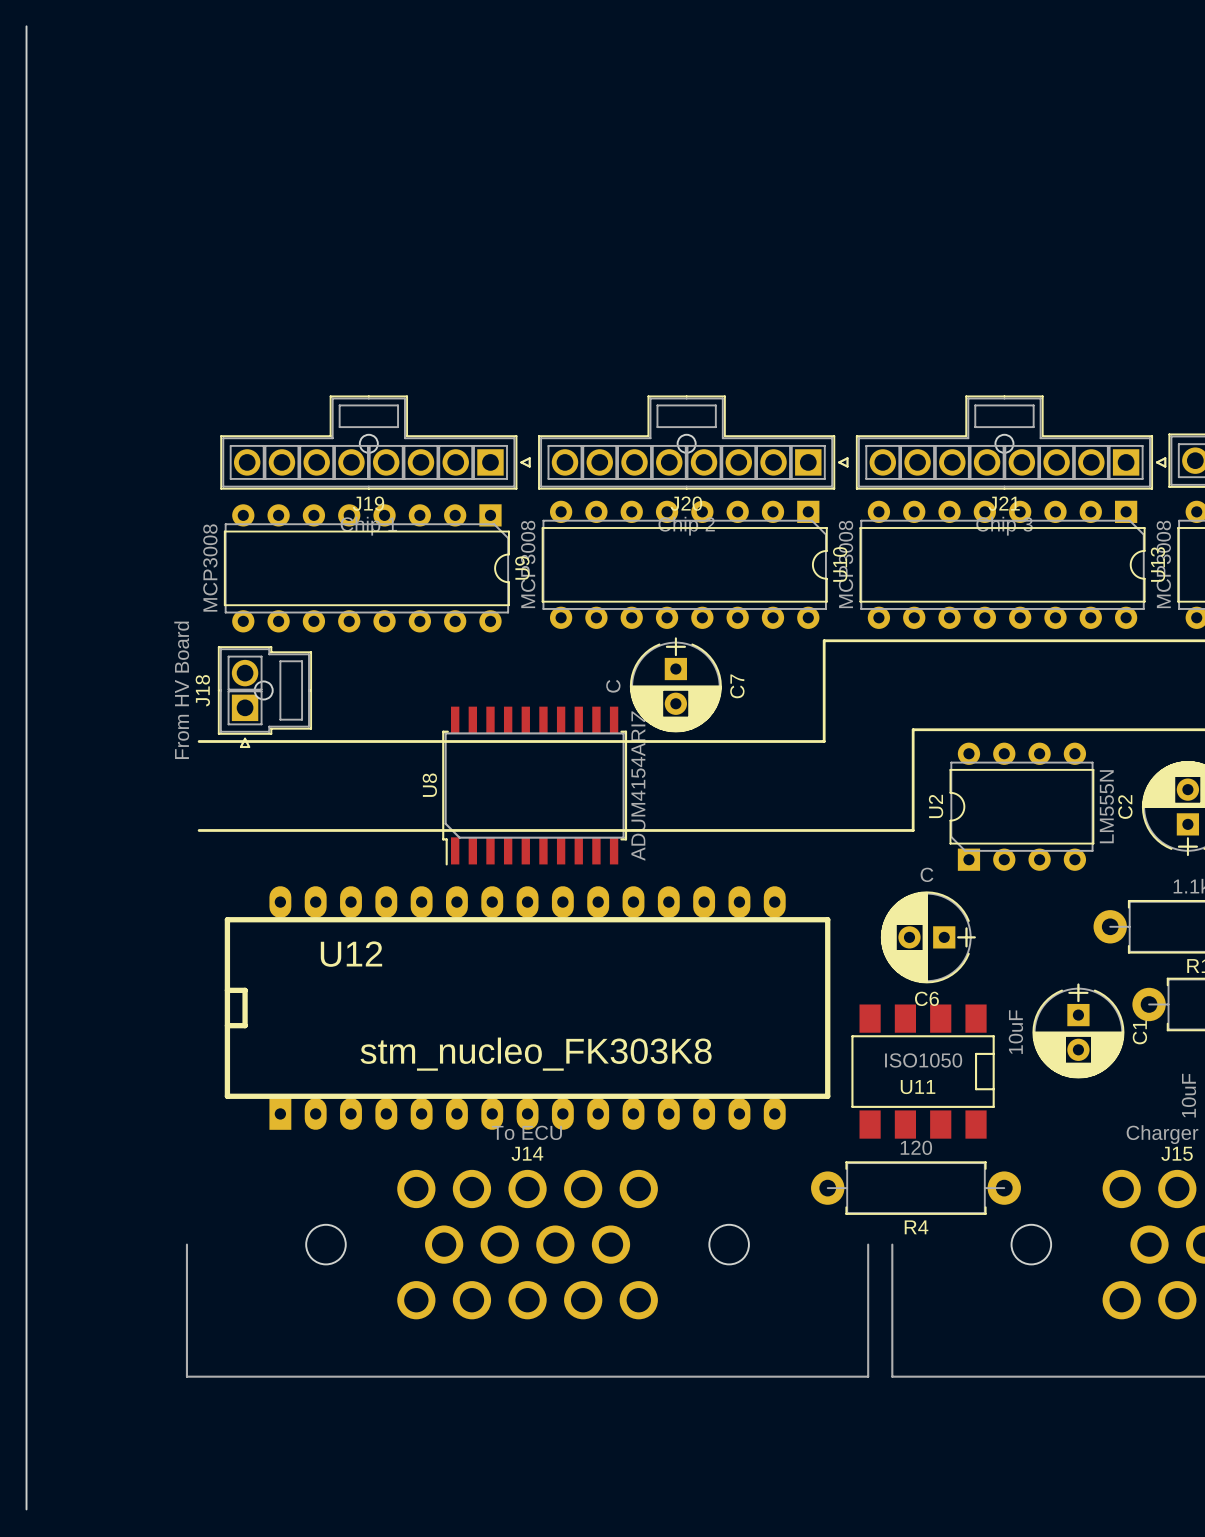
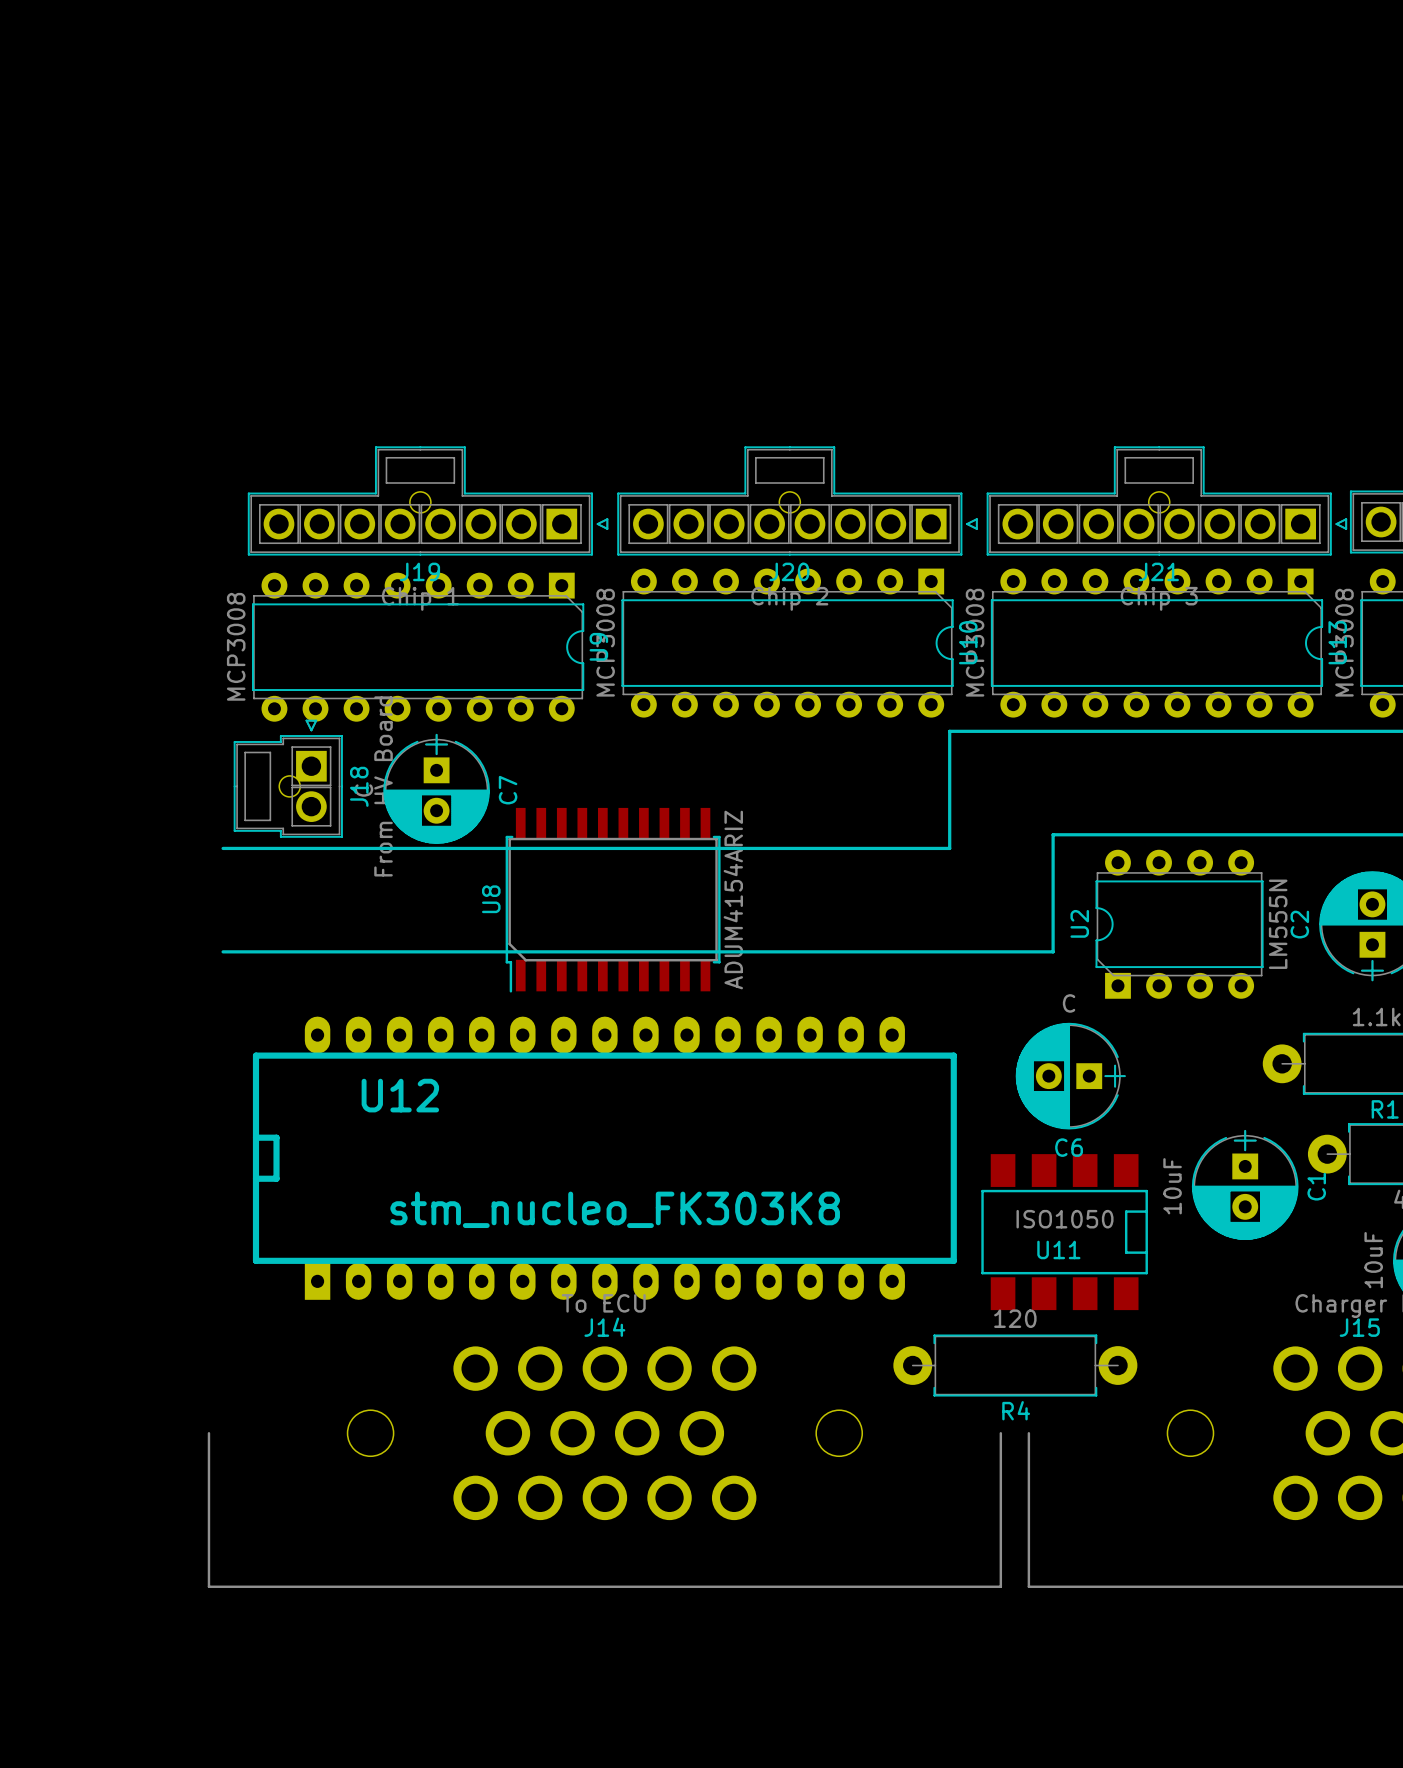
board edge: (26, 26) (26, 1509) -> none
C7 position: (675, 684) -> (436, 788)
J18 rotation: 0° (264, 697) -> 180° (288, 778)
R4 position: (916, 1188) -> (1015, 1365)

